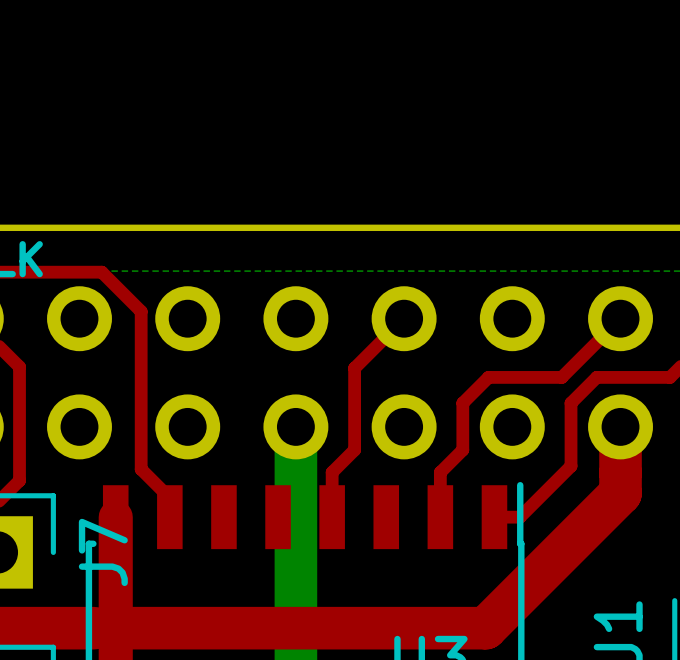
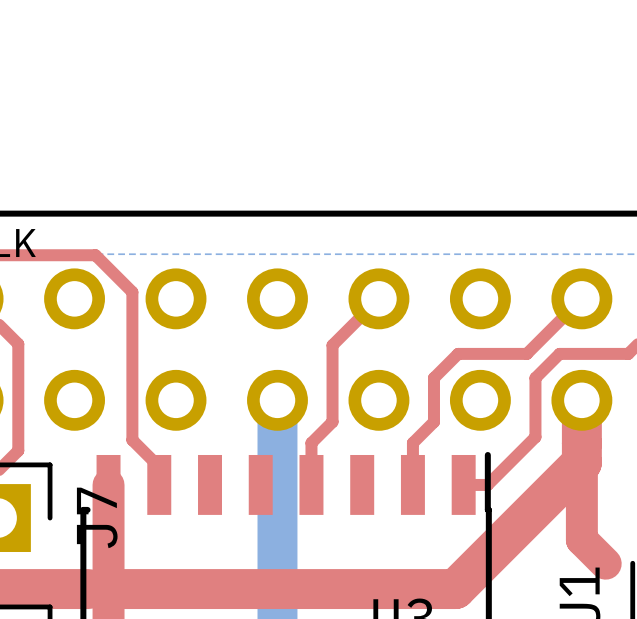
top track: none -> (581, 400) (581, 539) (605, 563)

